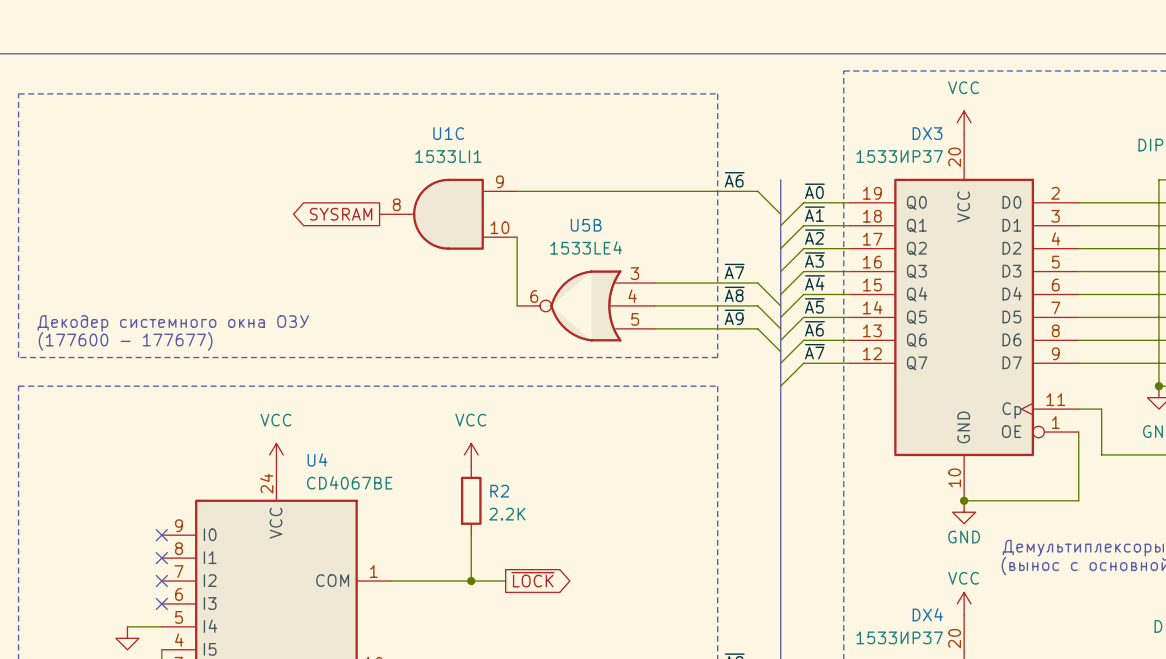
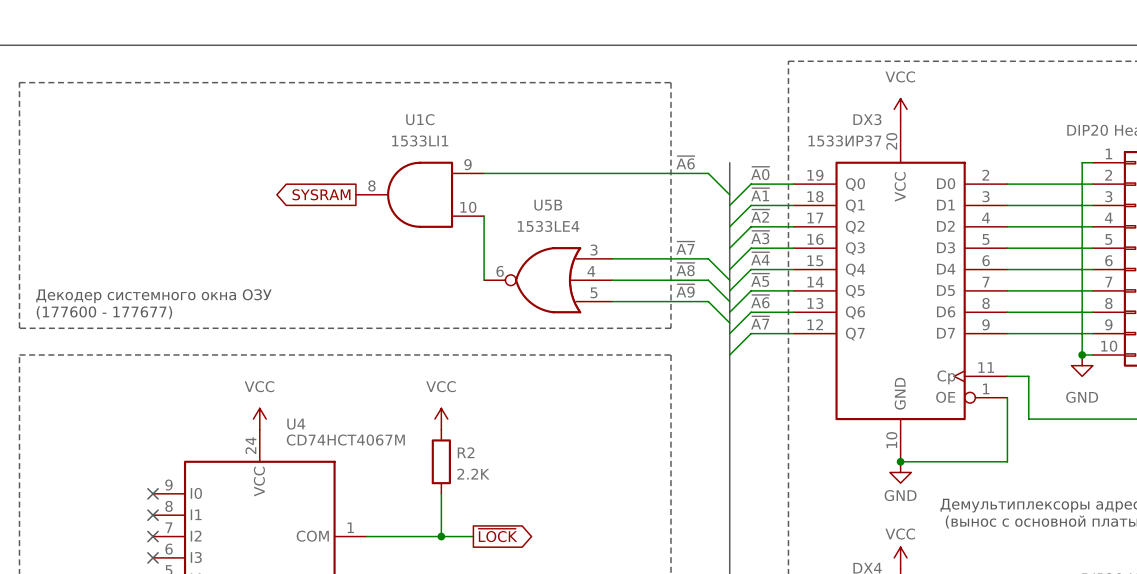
U4 value: CD4067BE (349, 482) -> CD74HCT4067M (345, 440)

